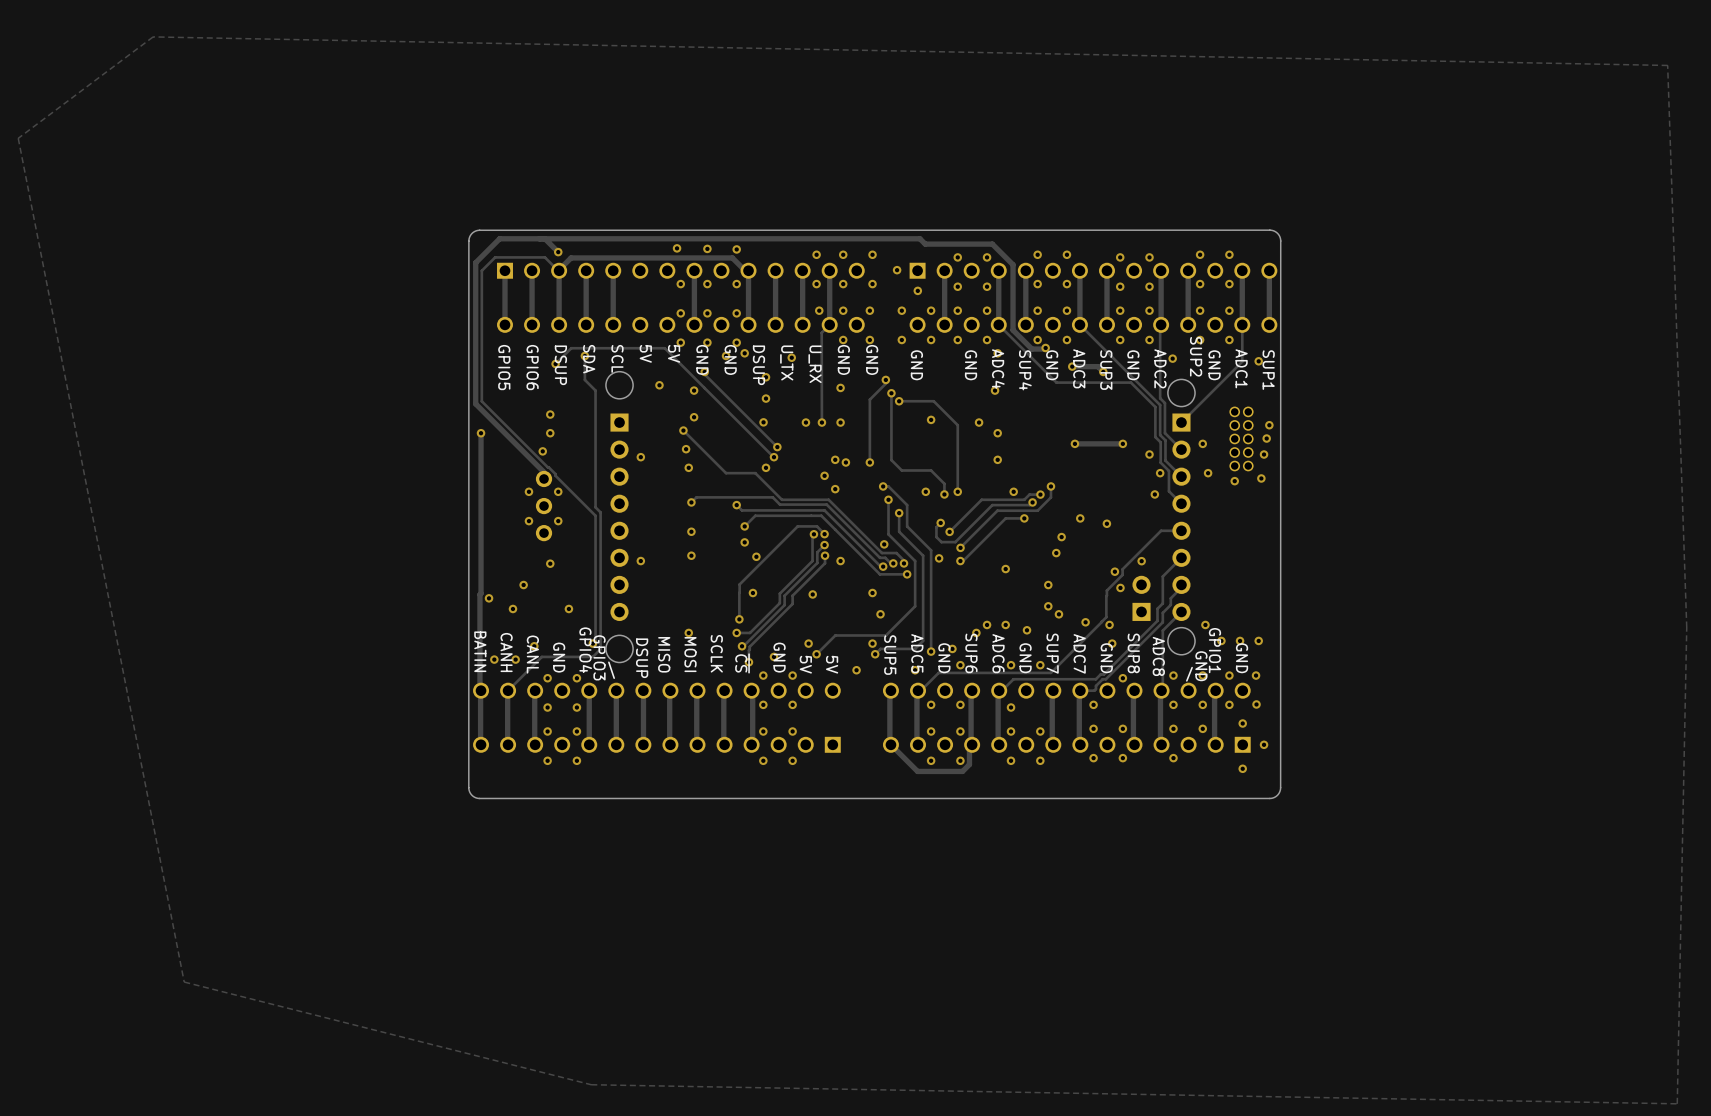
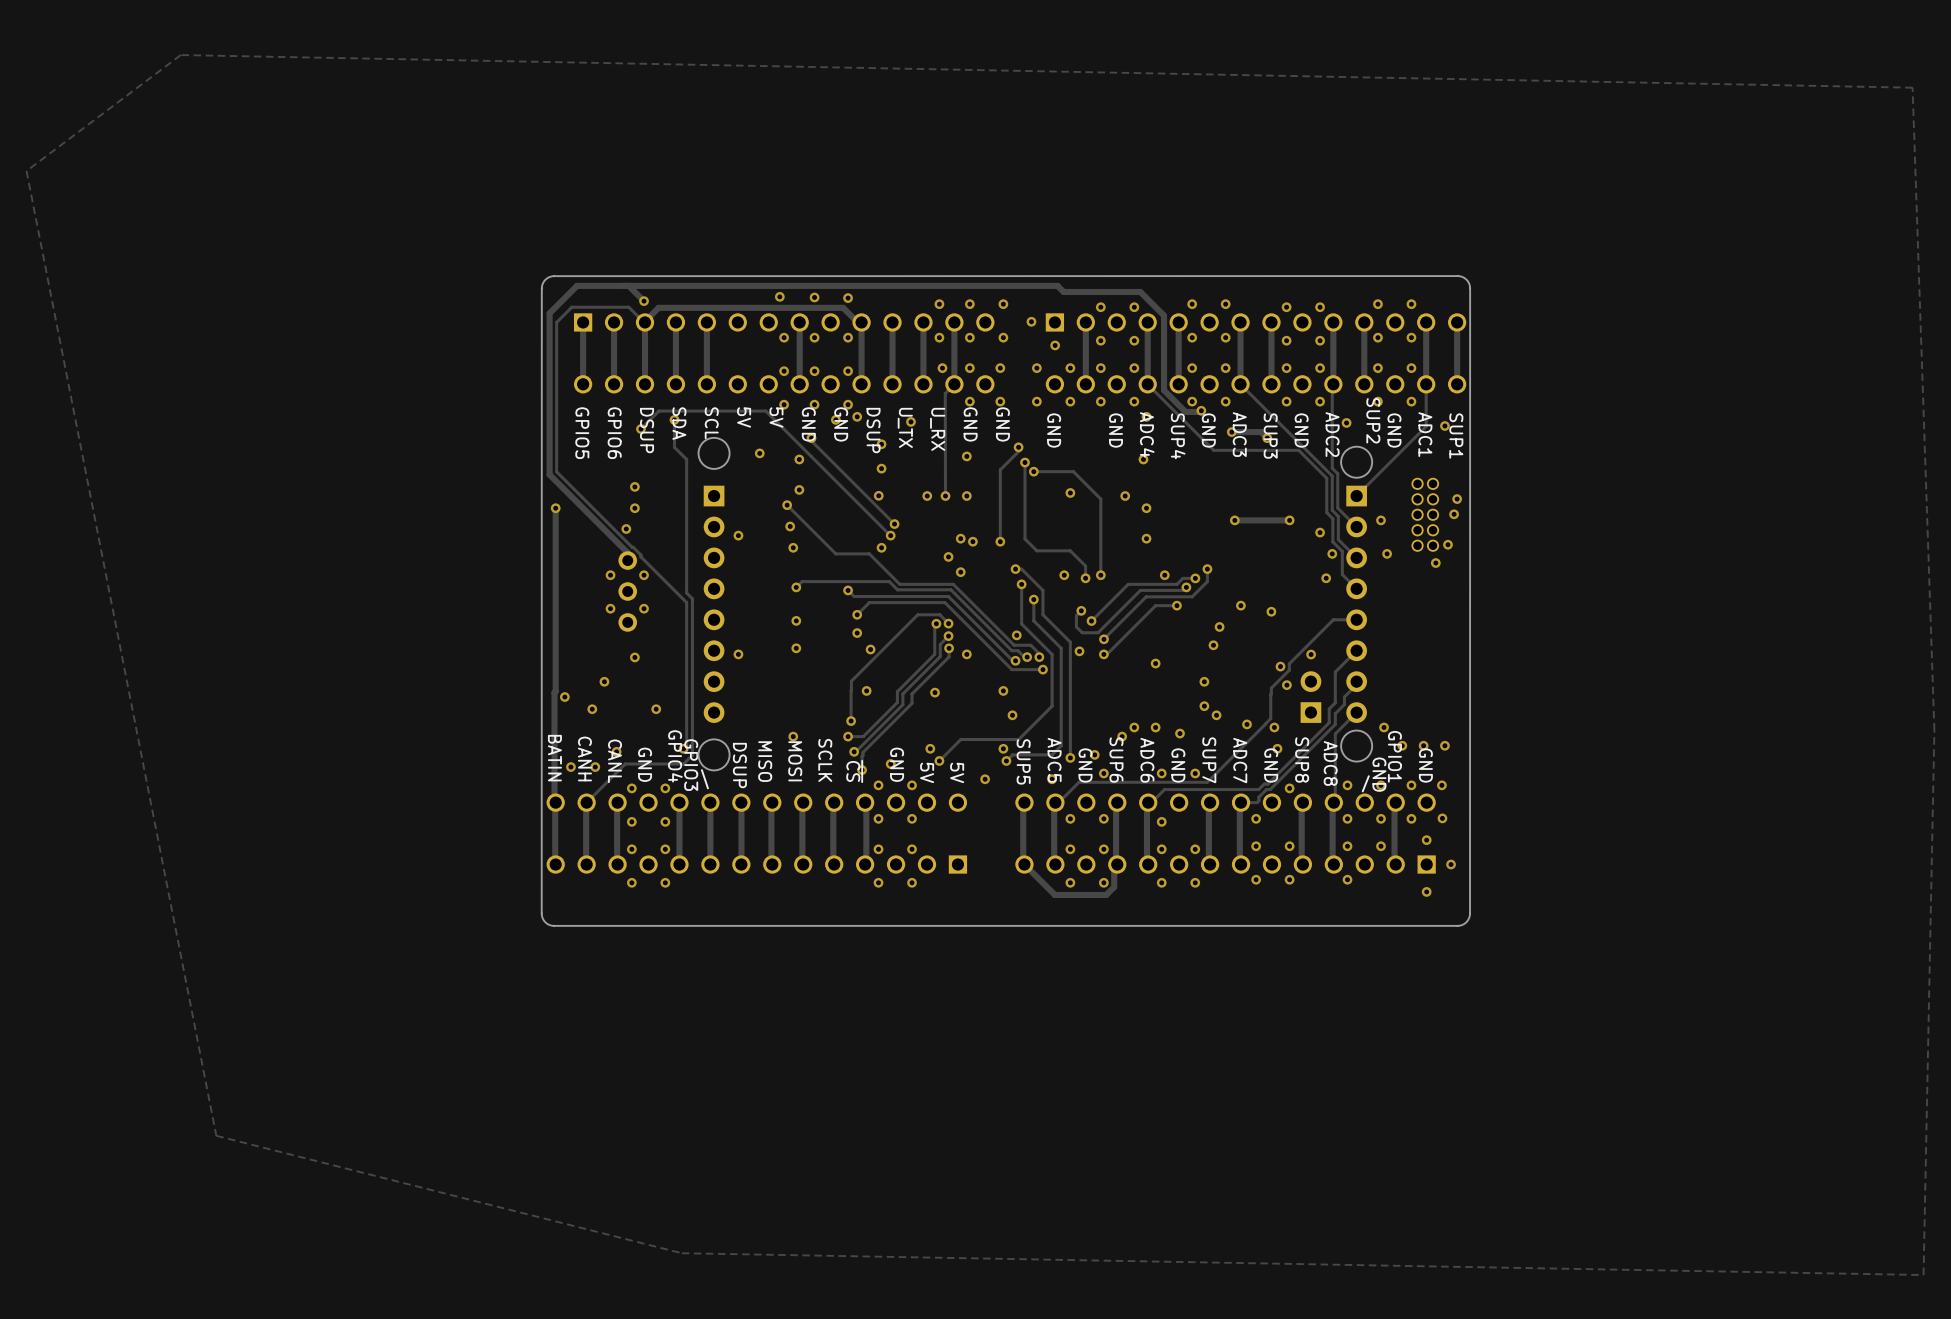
via: (1264, 454) -> none
via: none -> (1447, 544)
via: (1261, 478) -> none
via: (1234, 481) -> none
via: none -> (1435, 563)

